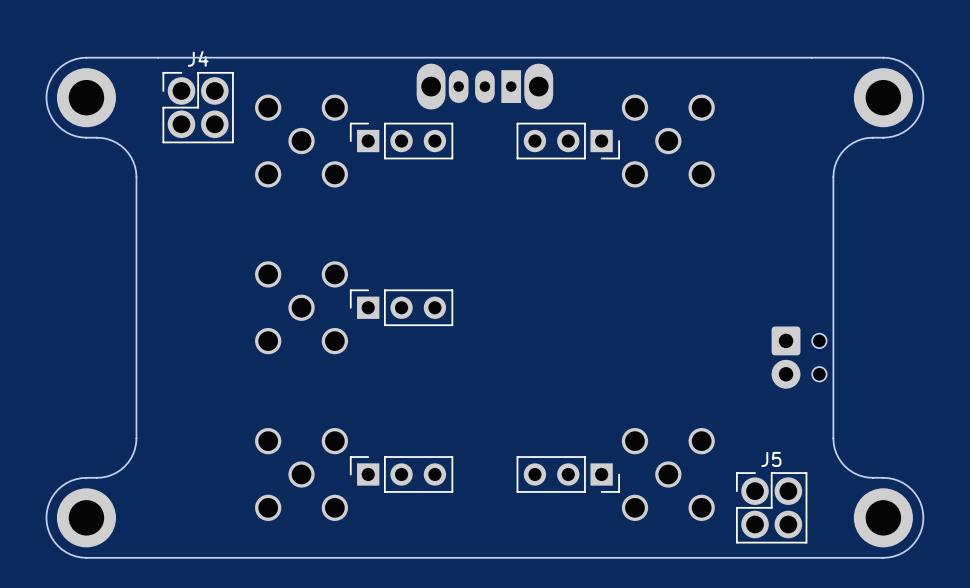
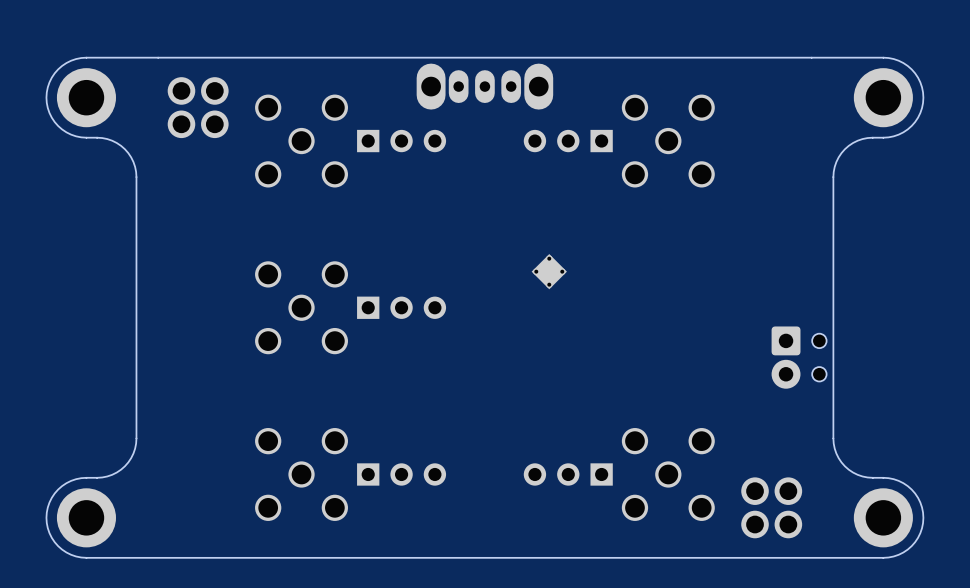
part footprint: [416, 63, 554, 110] -> [416, 63, 554, 110]
J4: (198, 107) -> none
part: none -> (198, 107)
part footprint: [349, 122, 454, 160] -> [357, 129, 447, 153]
part footprint: [516, 122, 620, 160] -> [523, 129, 613, 153]
part: none -> (549, 271)
part footprint: [349, 289, 454, 327] -> [357, 296, 447, 319]
part footprint: [349, 456, 454, 493] -> [357, 463, 447, 486]
part footprint: [516, 456, 620, 493] -> [523, 463, 613, 486]
J5: (771, 507) -> none
part: none -> (771, 507)

